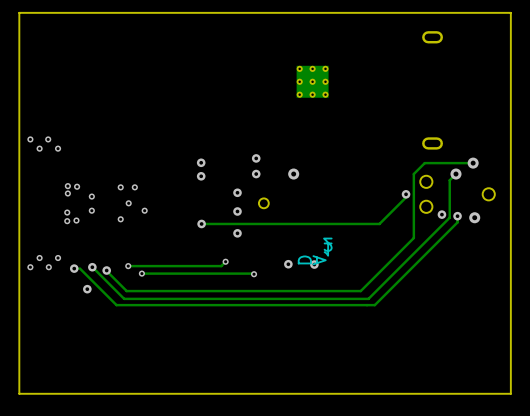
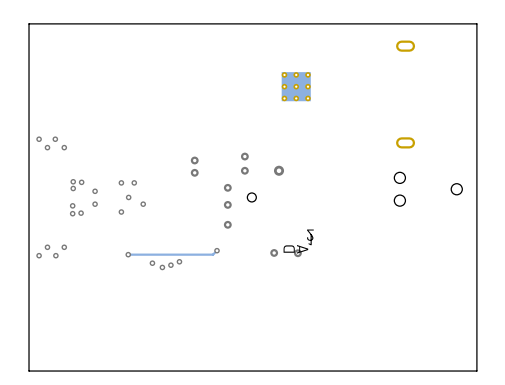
track: (473, 163) (424, 163) (413, 174) (413, 238) (360, 291) (126, 291) (106, 270) -> none
via: (473, 163) -> none
via: (455, 174) -> none
track: (454, 175) (455, 174) (449, 180) (449, 217) (368, 298) (124, 298) (93, 267) -> none
track: (406, 194) (406, 197) (379, 223) (201, 223) -> none
via: (406, 194) -> none
via: (441, 214) -> none
track: (457, 216) (455, 216) (457, 222) (374, 305) (116, 305) (80, 268) (73, 268) -> none
via: (457, 216) -> none
via: (474, 217) -> none
via: (201, 223) -> none
via: (92, 267) -> none
via: (74, 268) -> none
via: (106, 270) -> none
track: (141, 273) (254, 274) -> none
via: (141, 273) -> none
via: none -> (179, 261)
via: (254, 274) -> none
via: none -> (152, 263)
via: none -> (170, 265)
via: none -> (162, 267)
via: (87, 289) -> none

